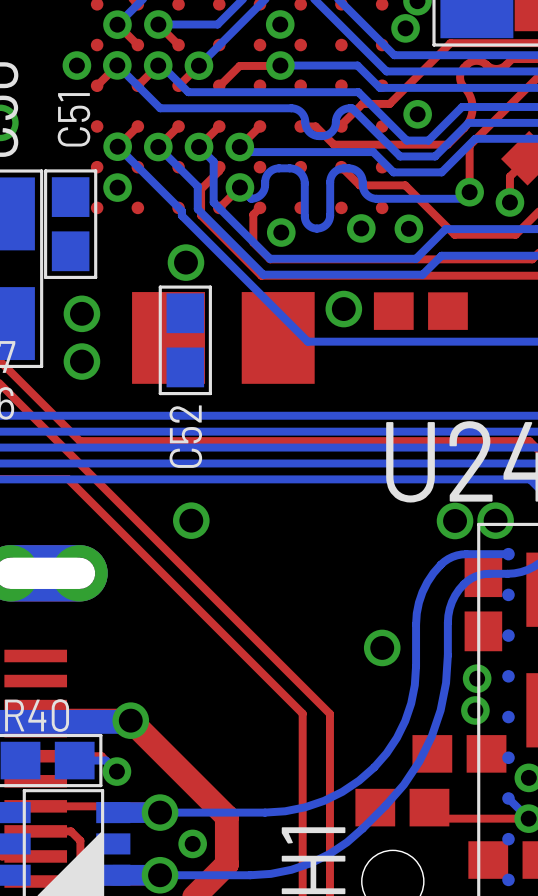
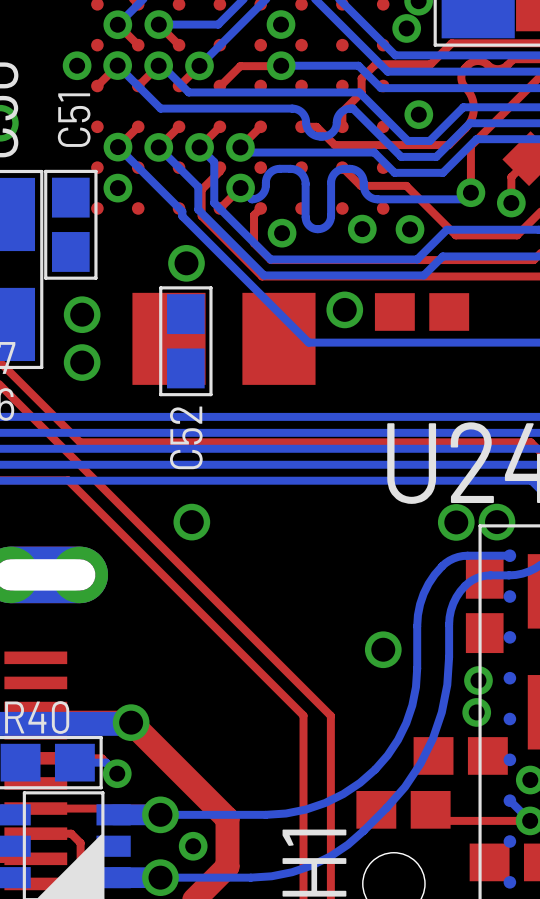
top track: (429, 64) (389, 103) (362, 103) (341, 124) -> (430, 64) (375, 64) (361, 78) (361, 92) (342, 111) (342, 125)

